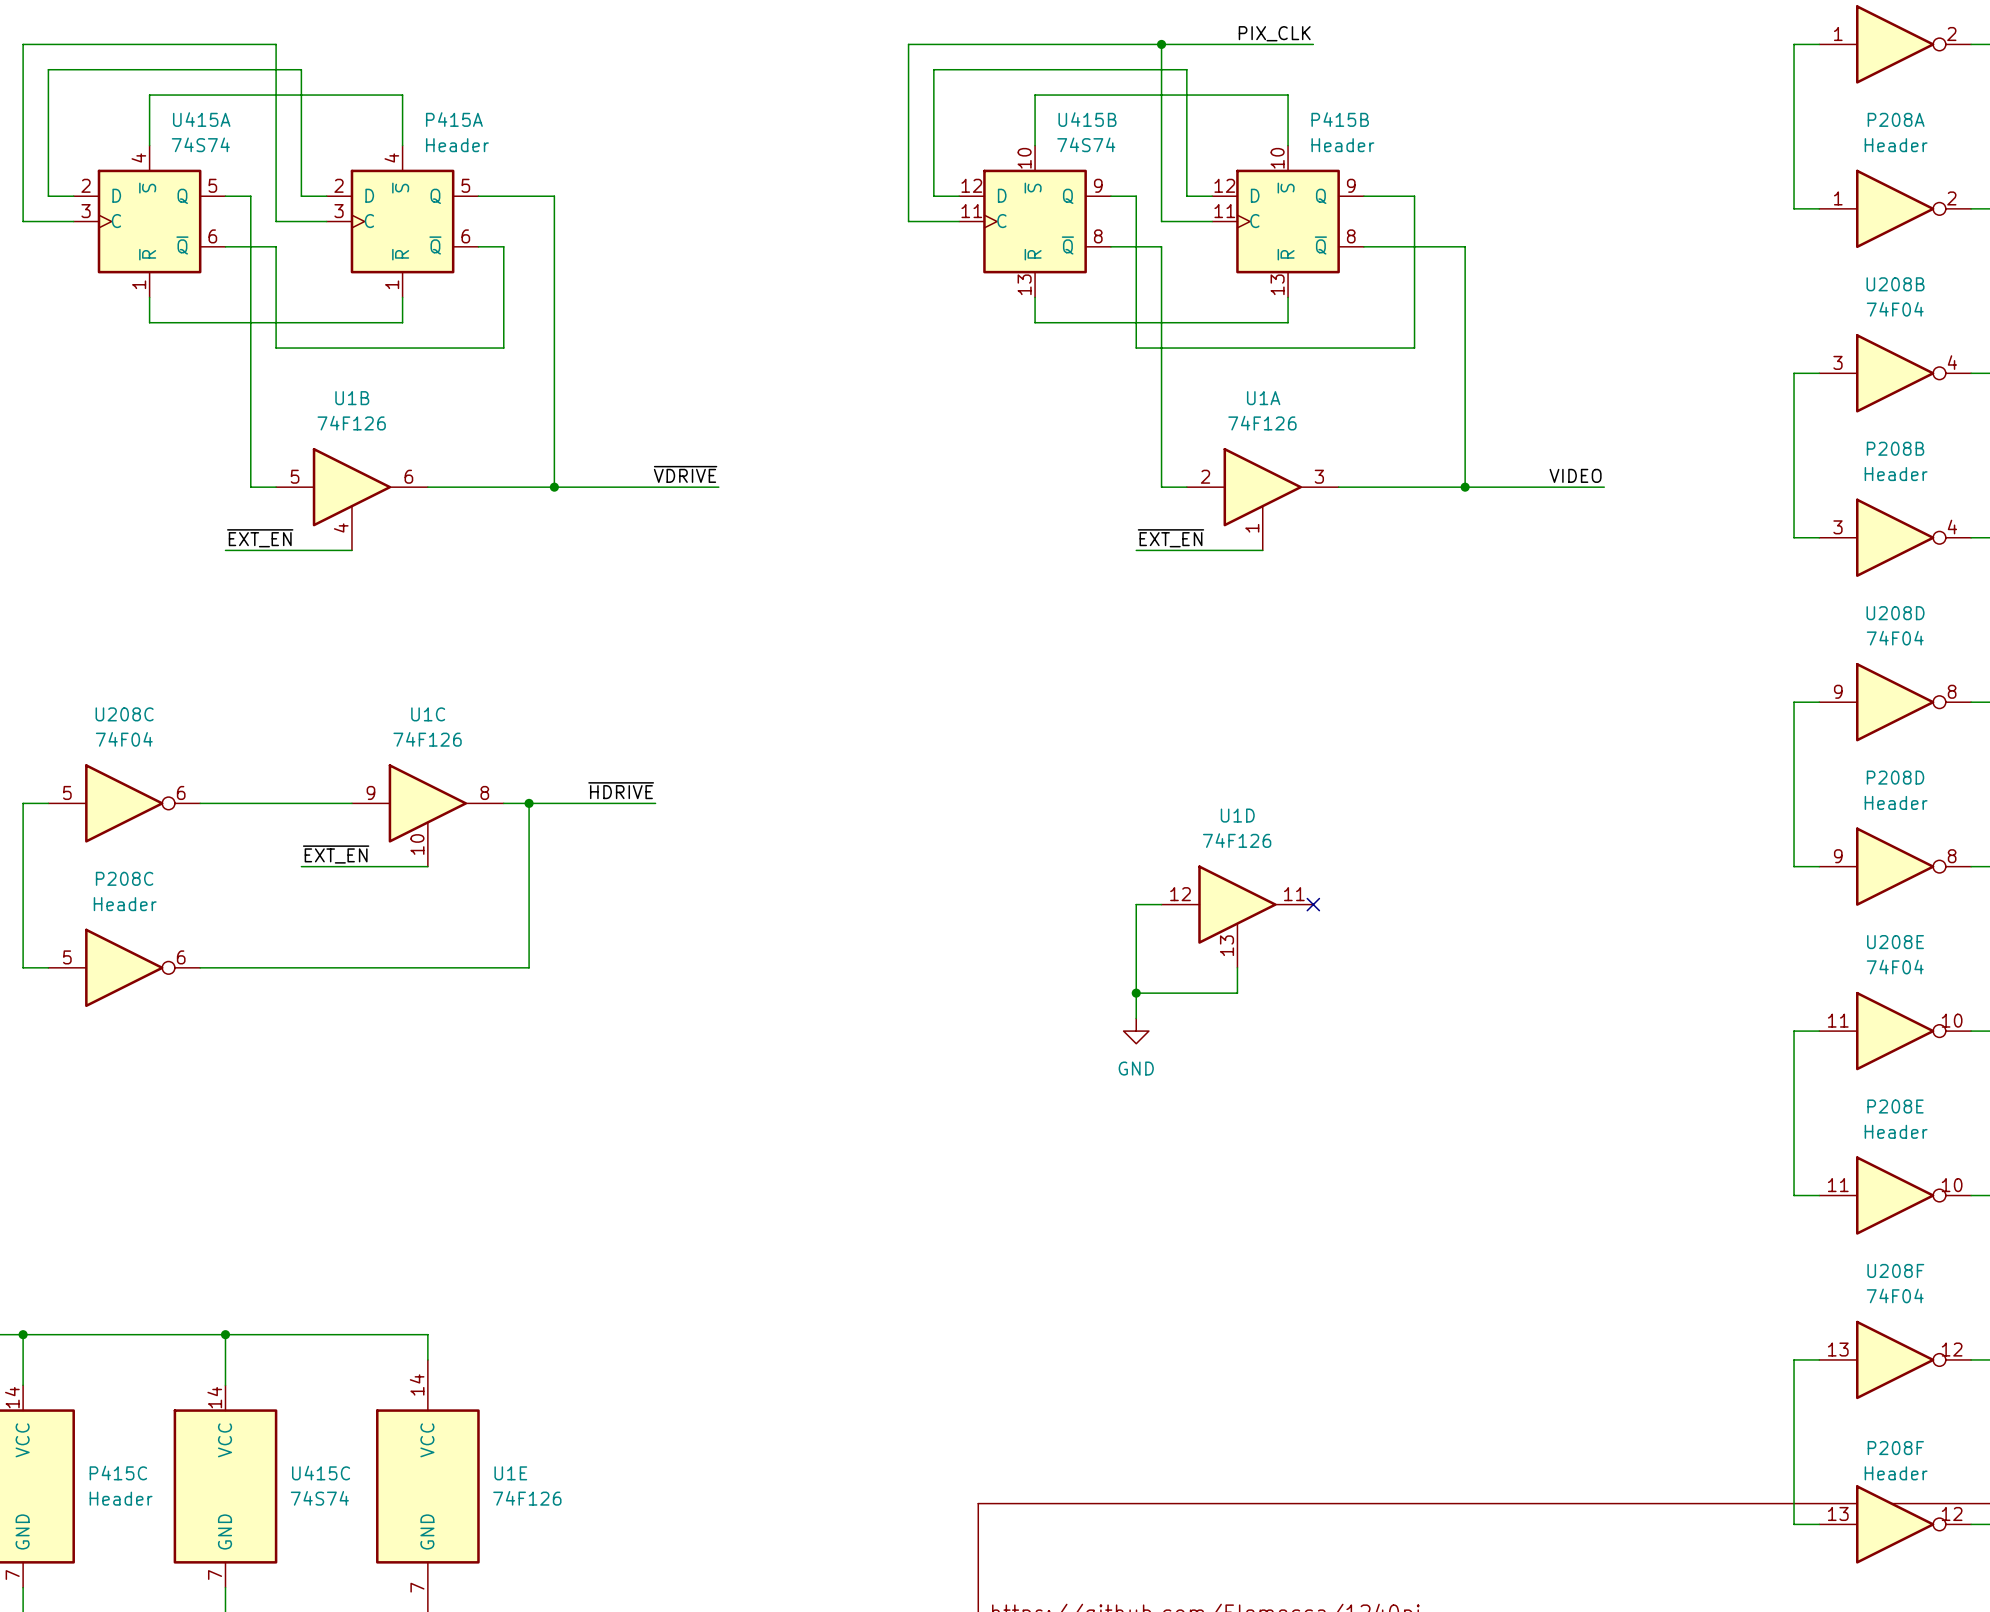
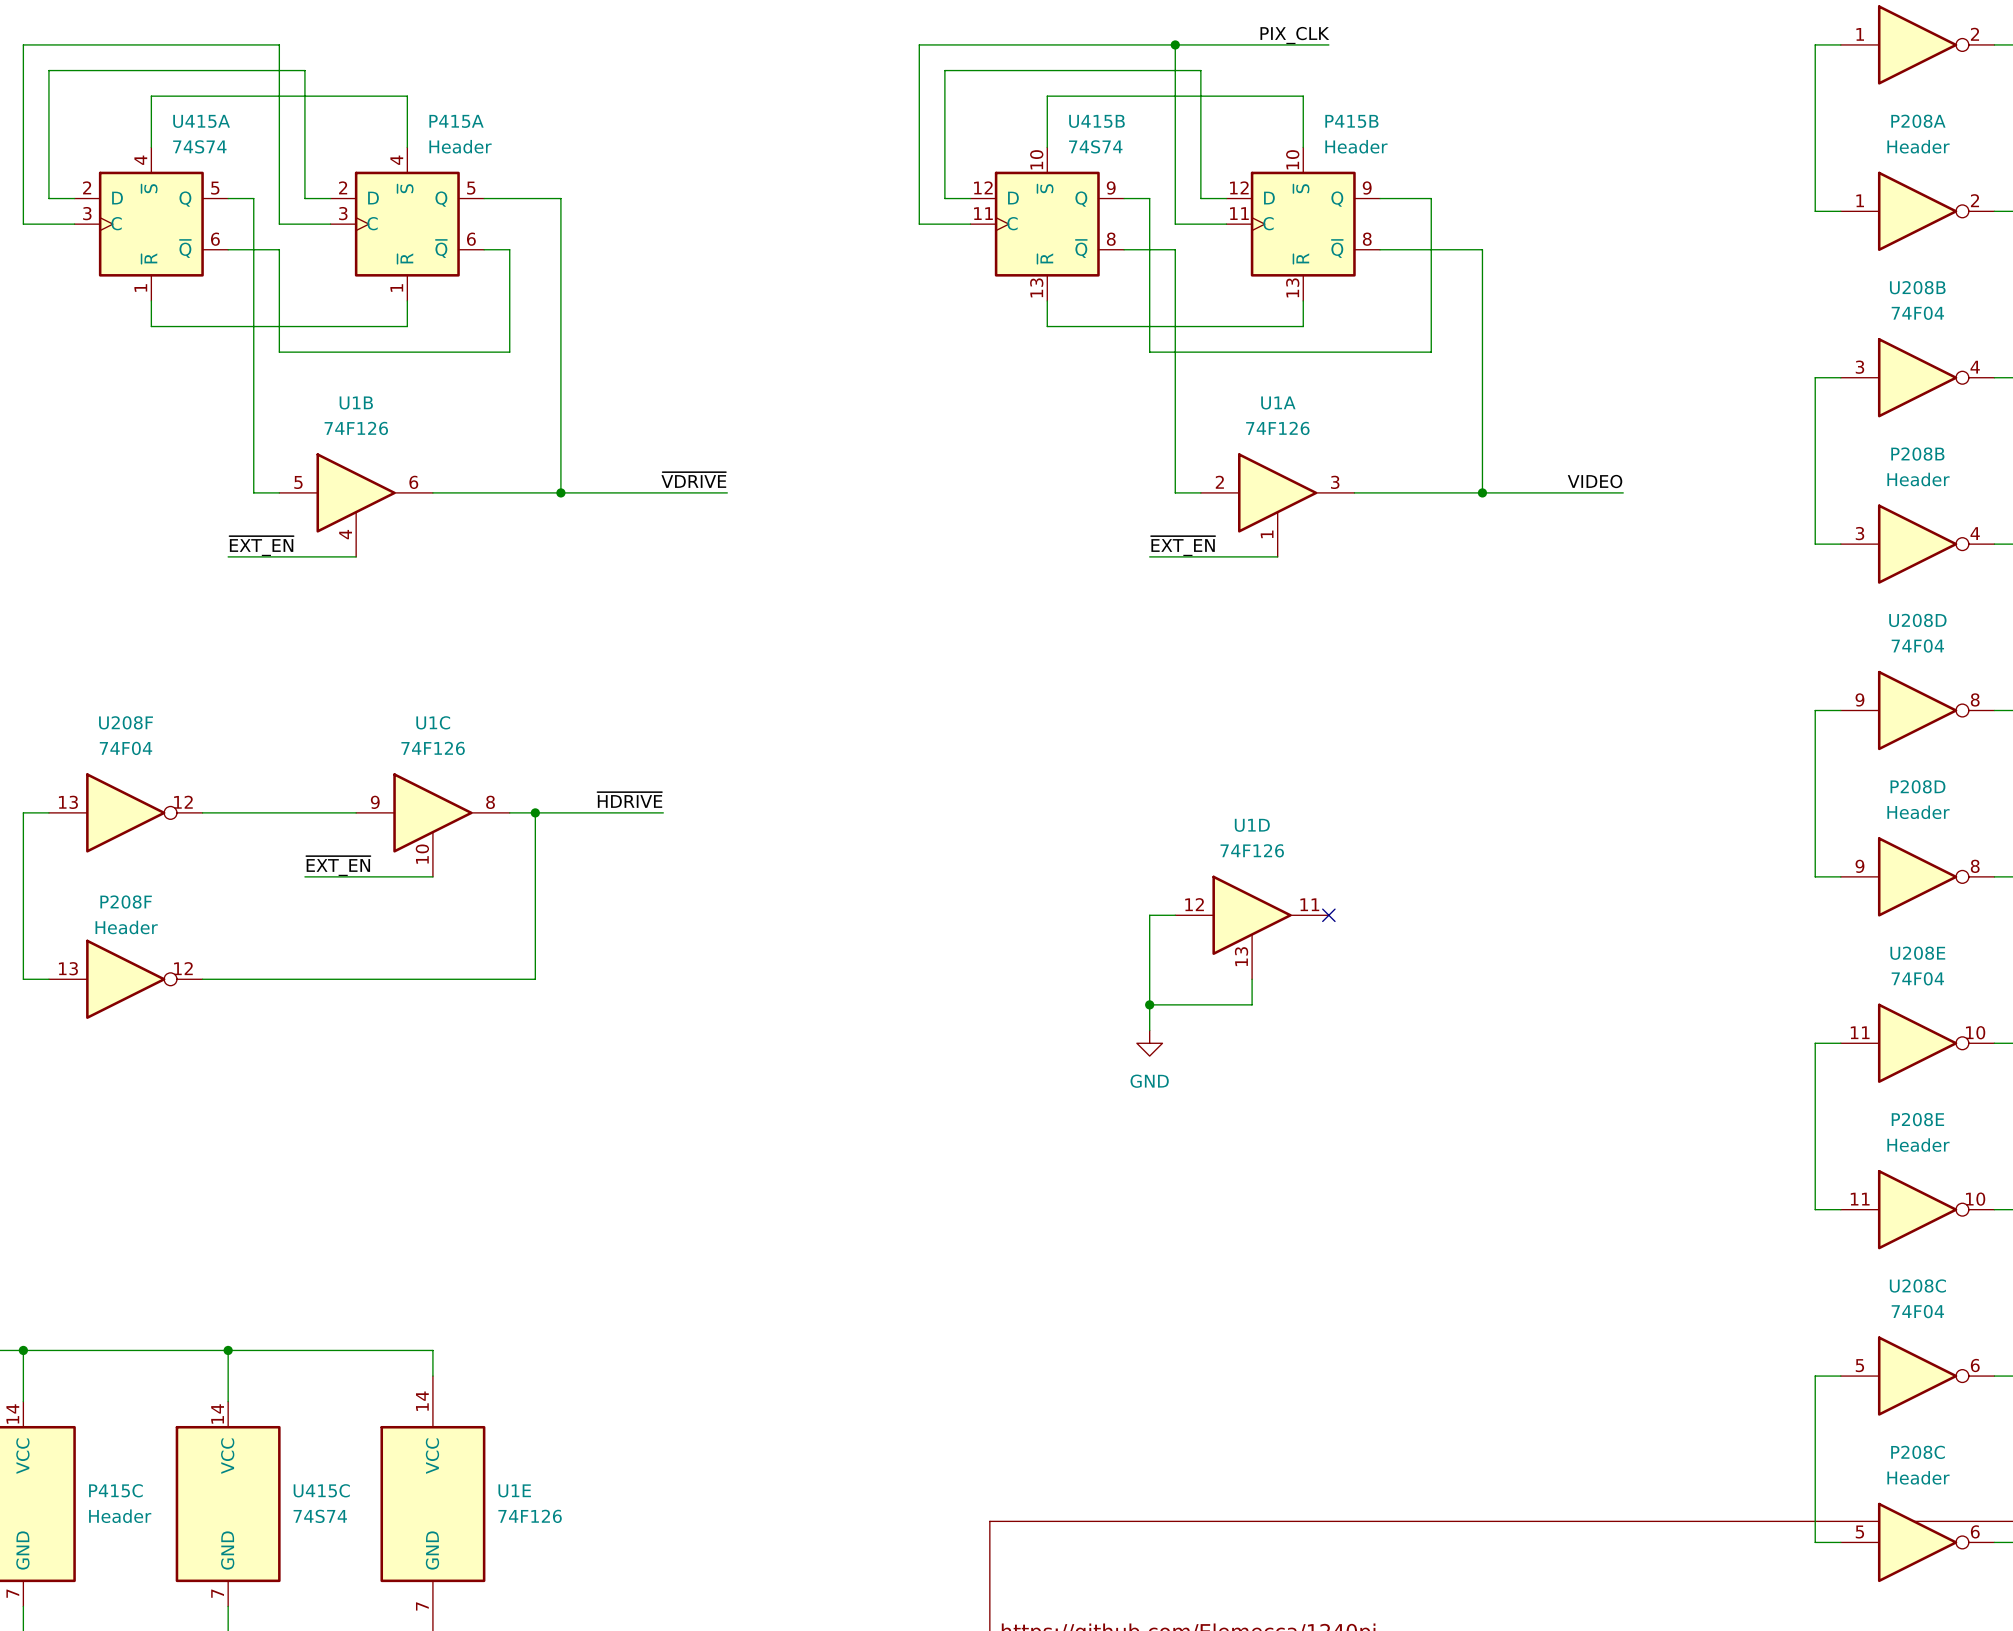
U208C position: (124, 803) -> (1917, 1376)
P208C position: (124, 967) -> (1917, 1542)
U208F position: (1895, 1359) -> (125, 812)
P208F position: (1895, 1524) -> (125, 979)

